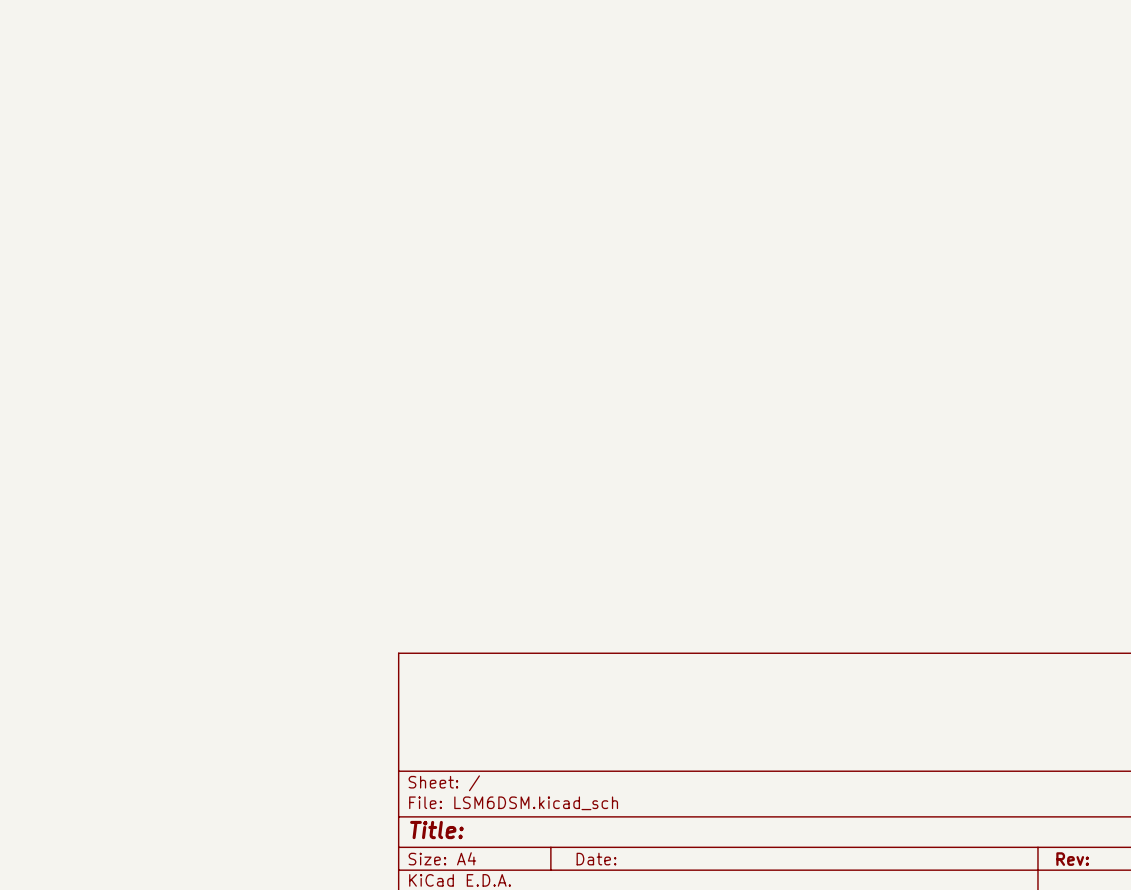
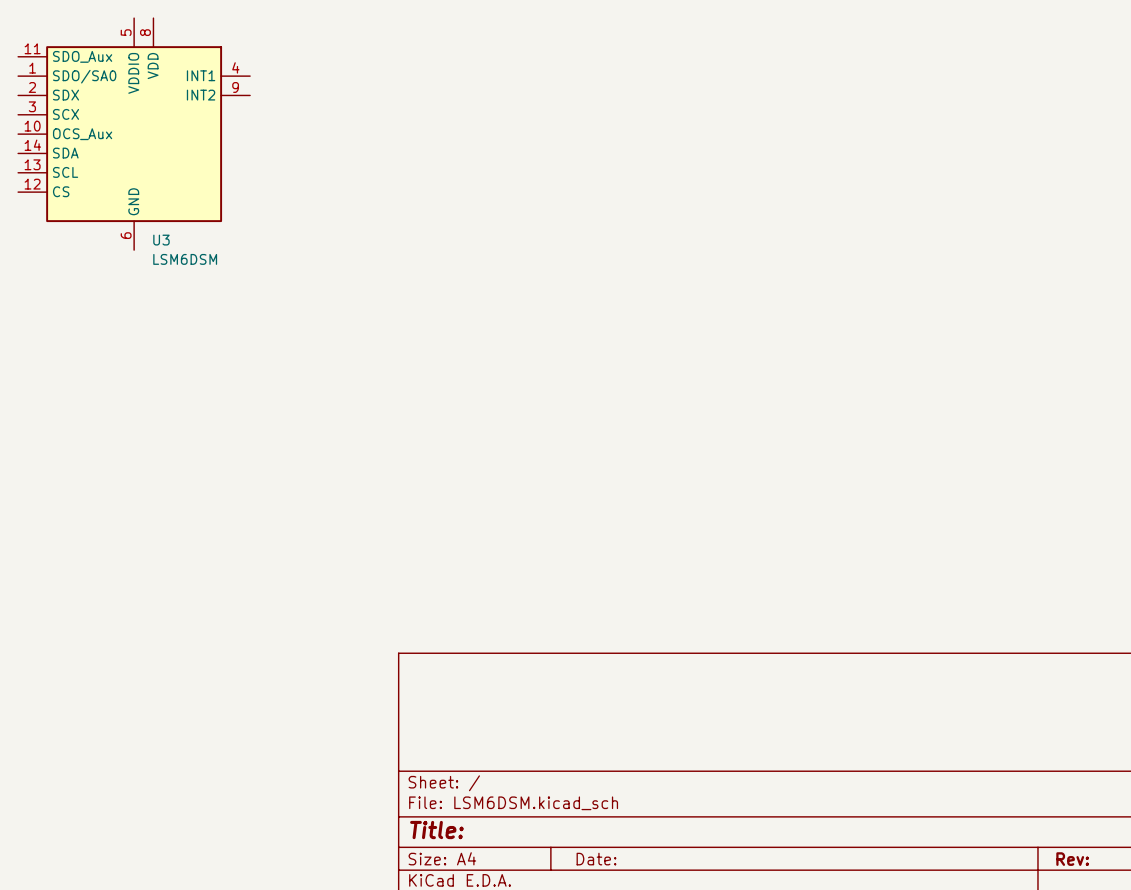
U3: none -> LSM6DSM (134, 134)

